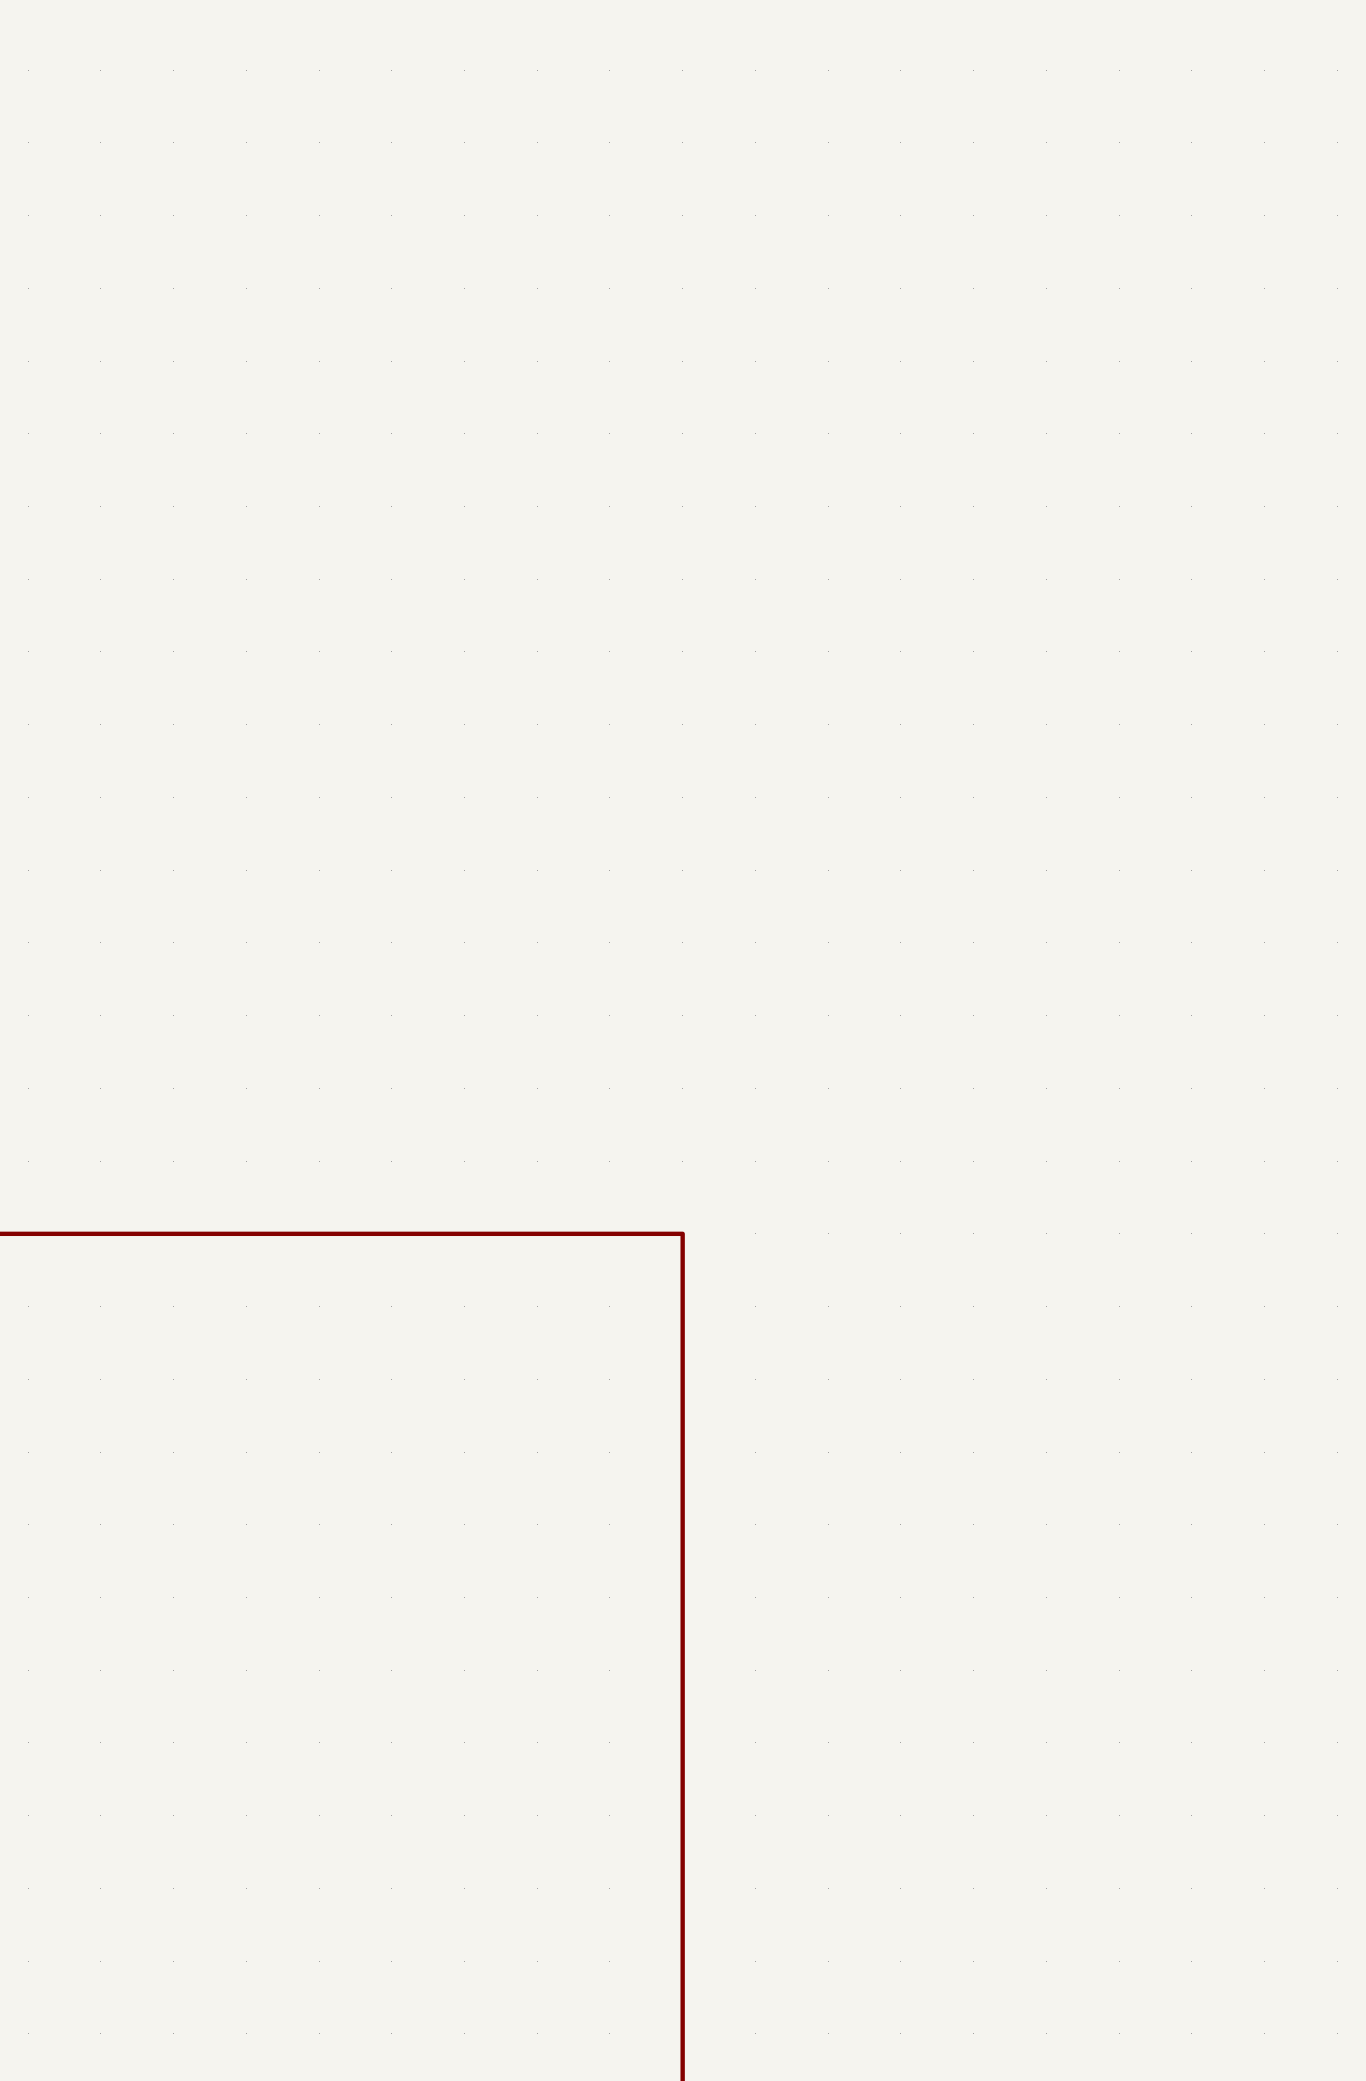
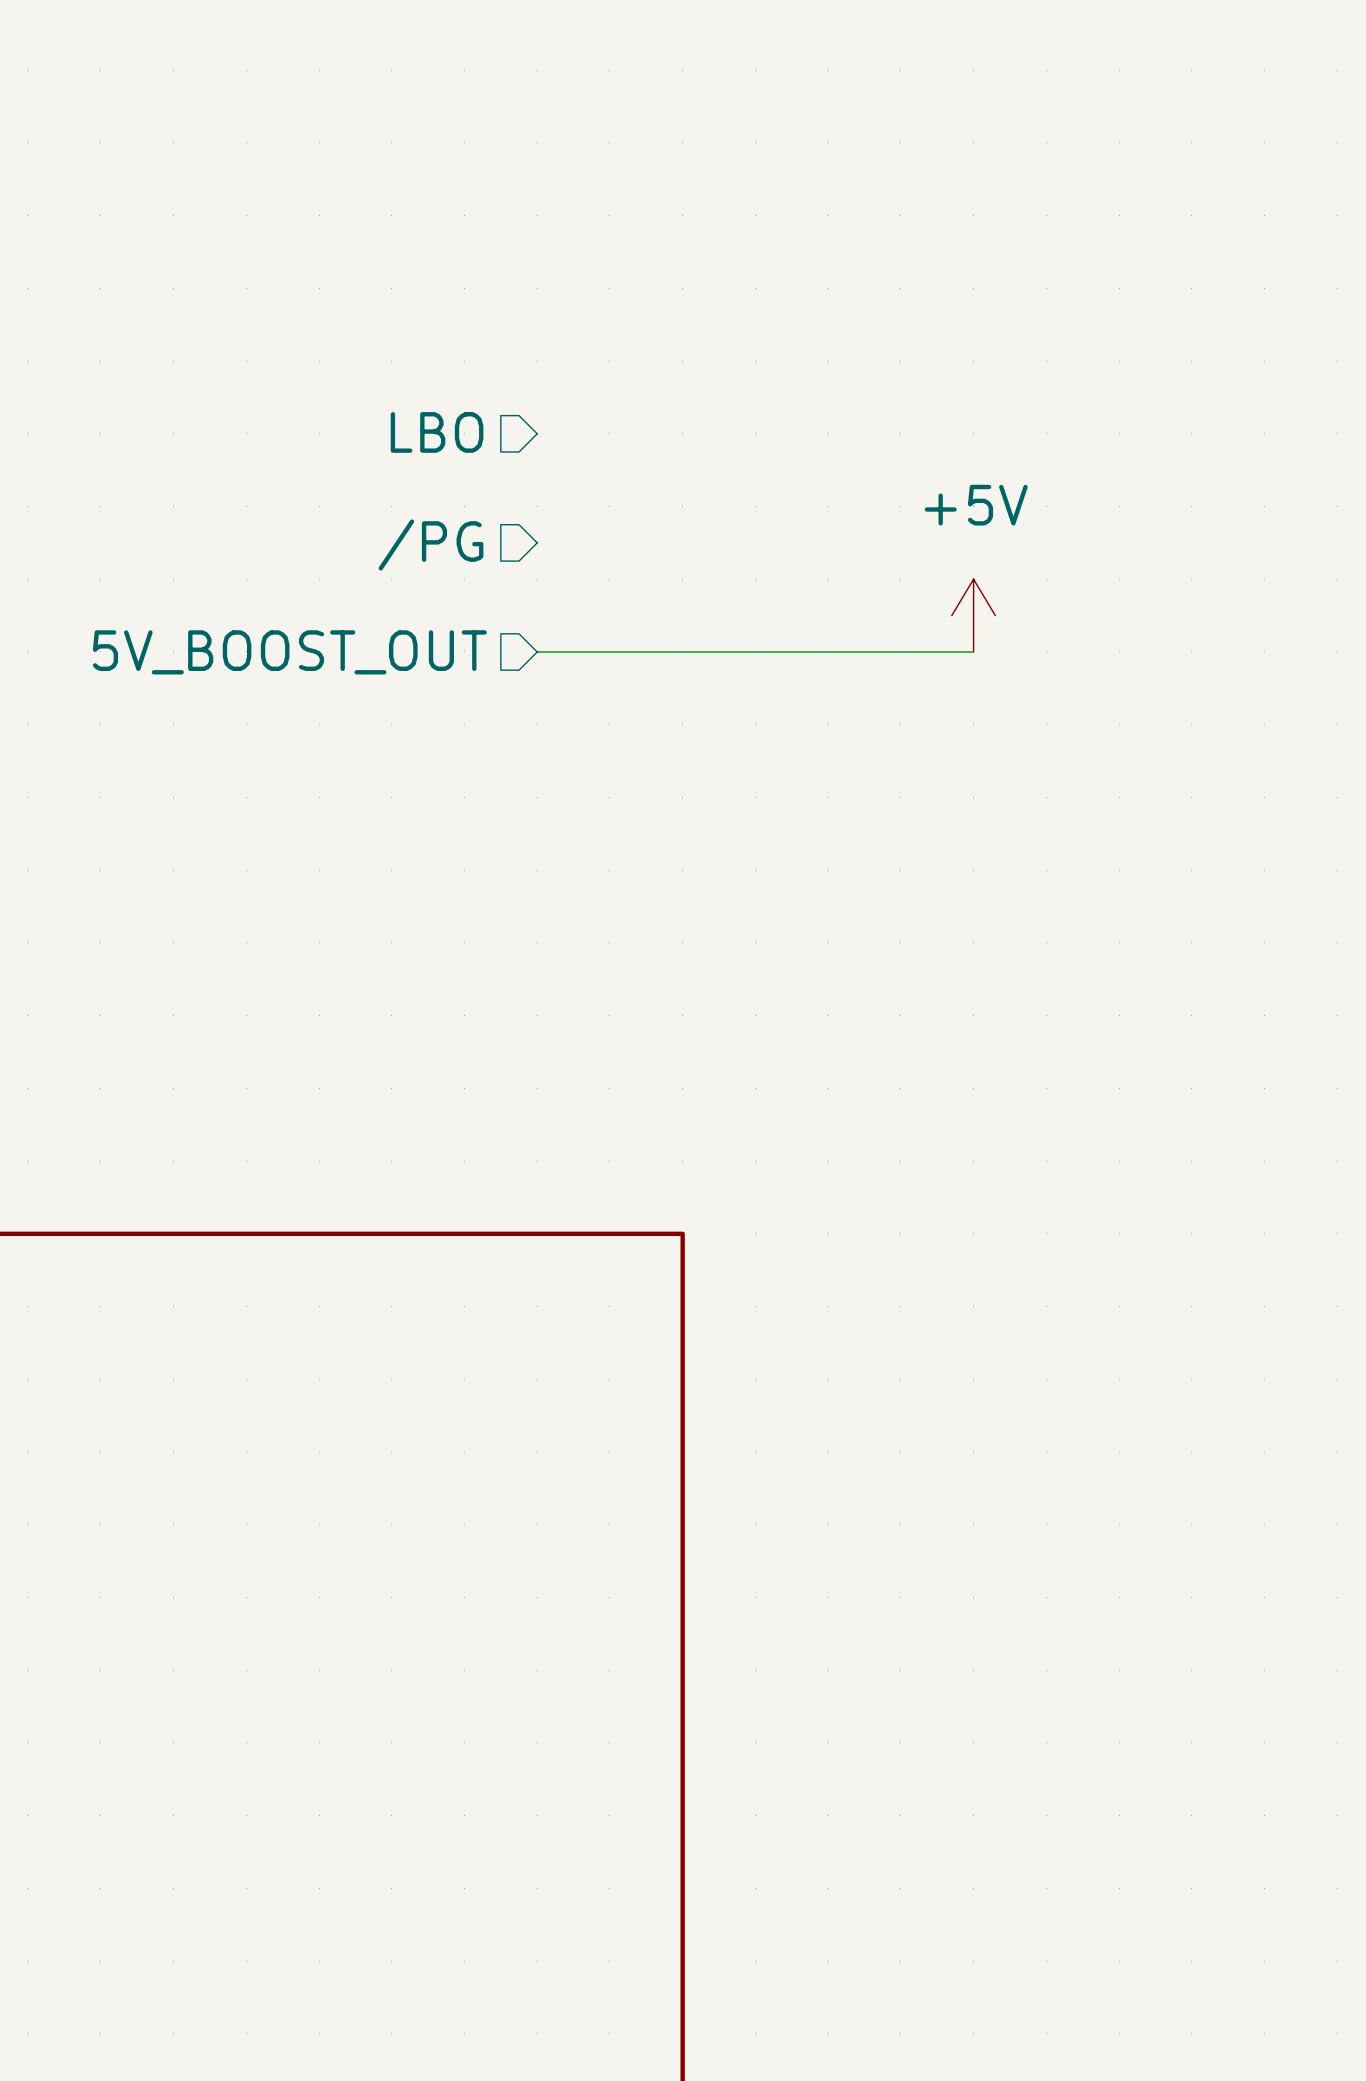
sheet pin: none -> LBO (437, 432)
sheet pin: none -> /PG (431, 545)
power symbol: none -> +5V (973, 615)
wire: none -> (537, 651) (973, 651)
sheet pin: none -> 5V_BOOST_OUT (289, 652)

